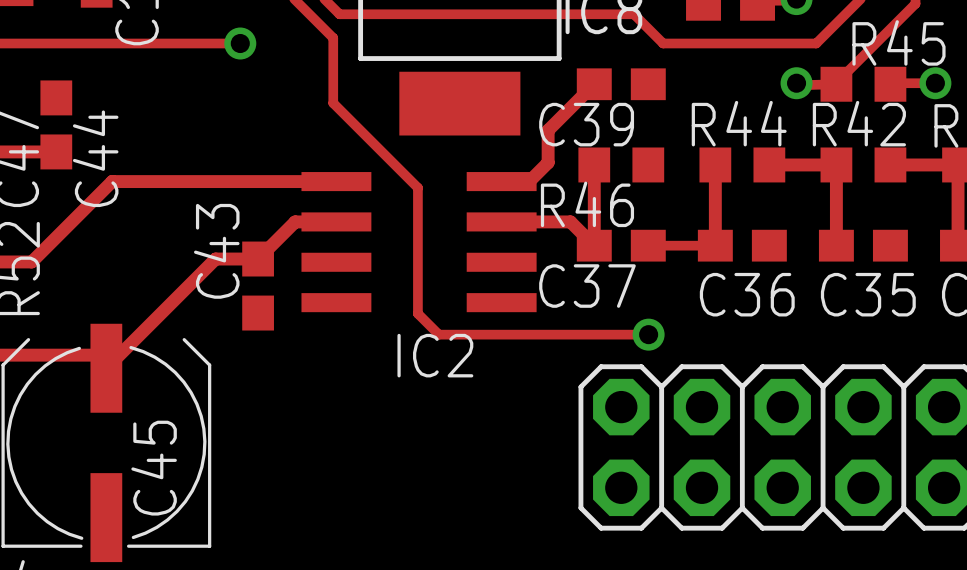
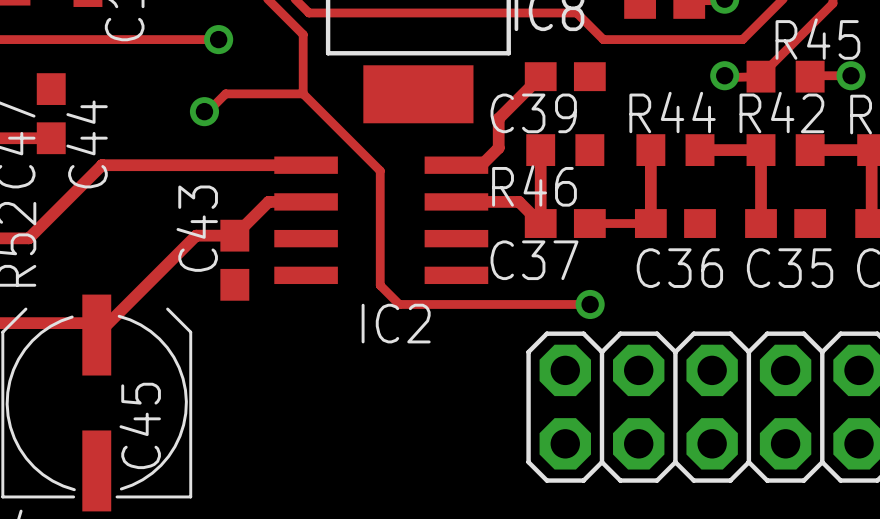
track: none -> (303, 93) (225, 93) (207, 111) (204, 111)
via: none -> (204, 111)

